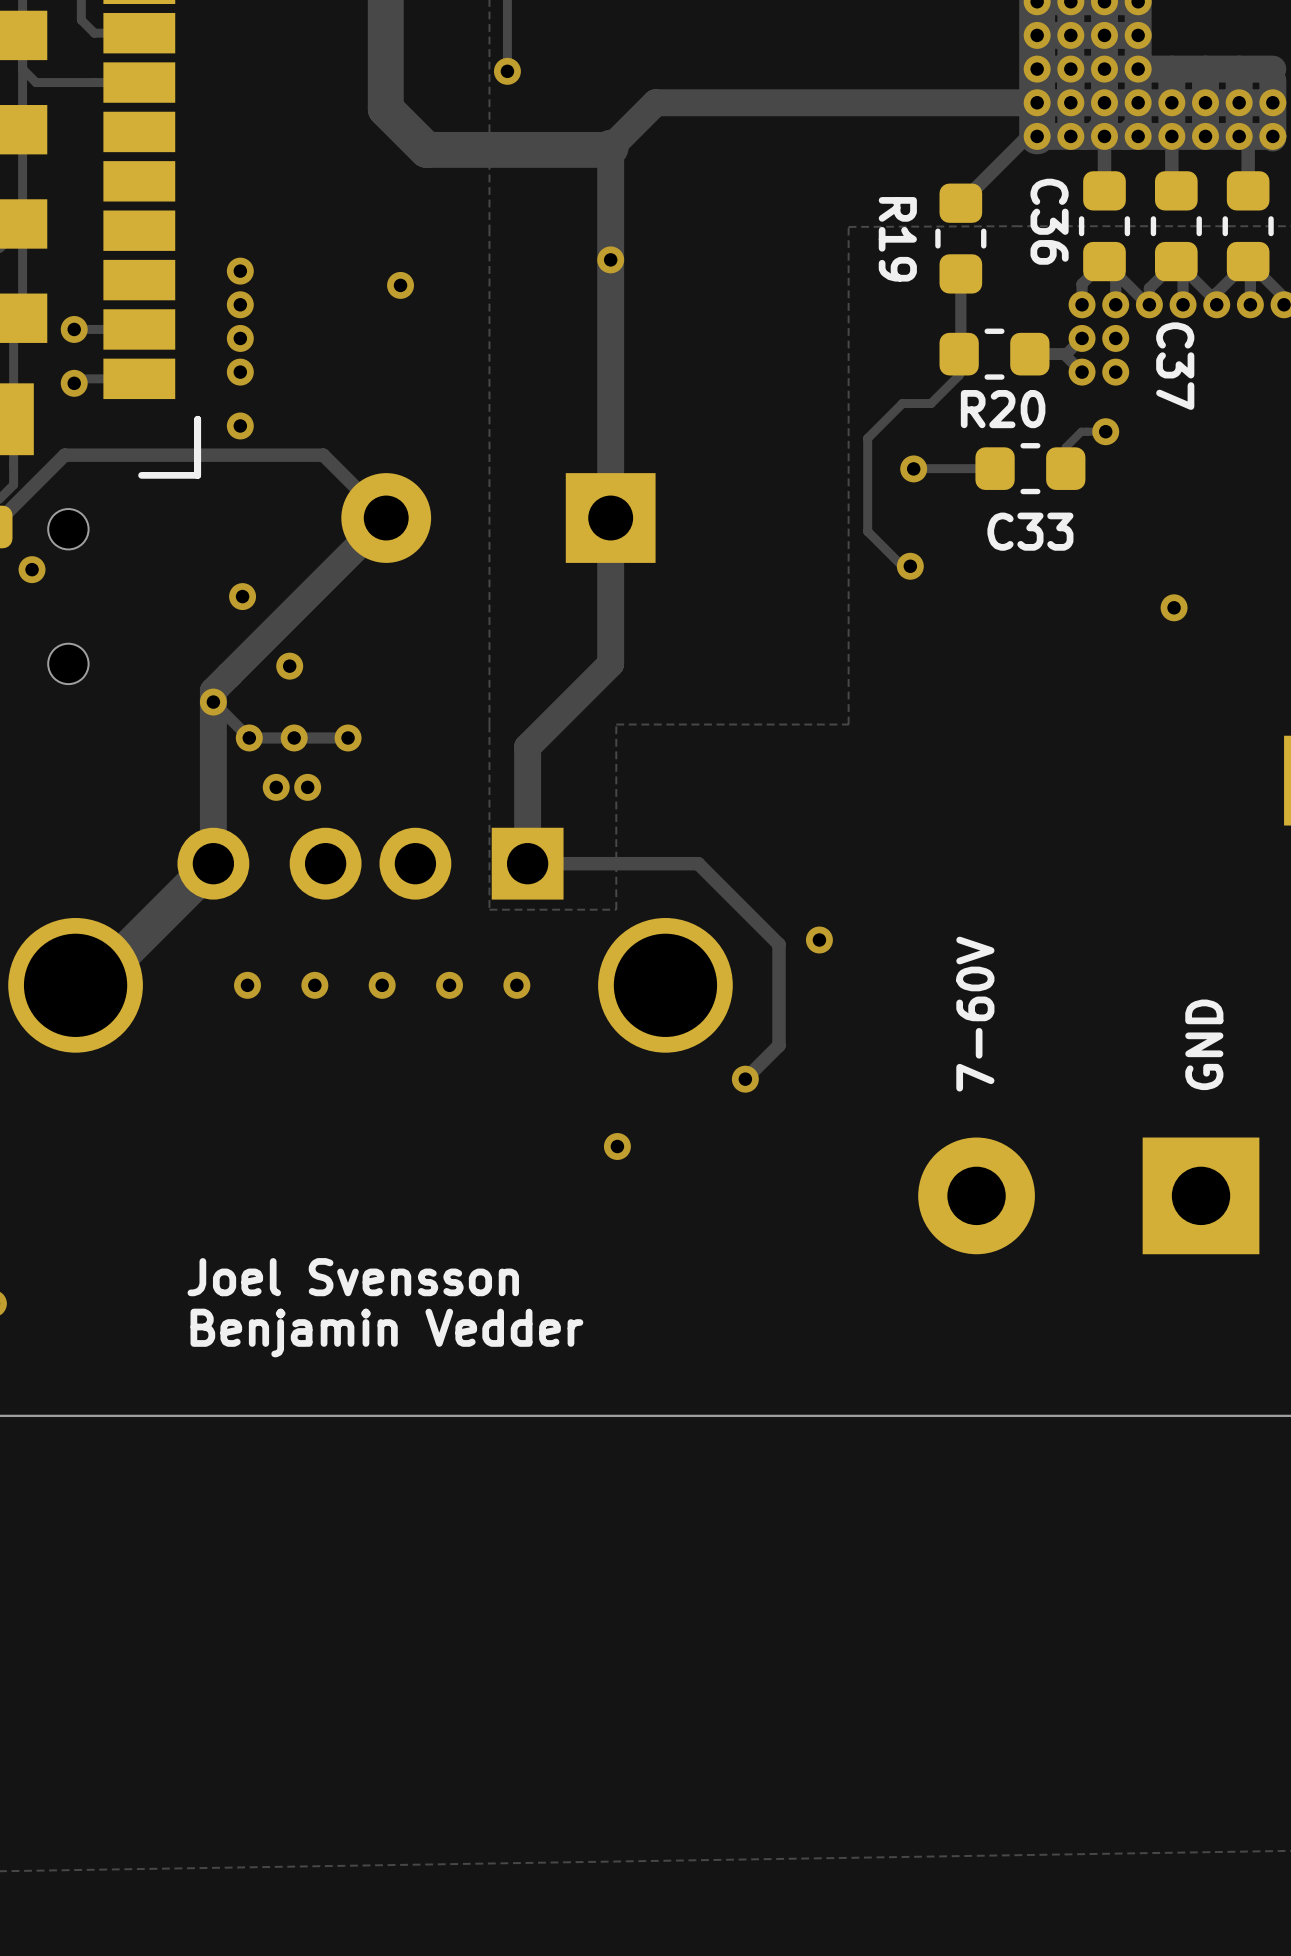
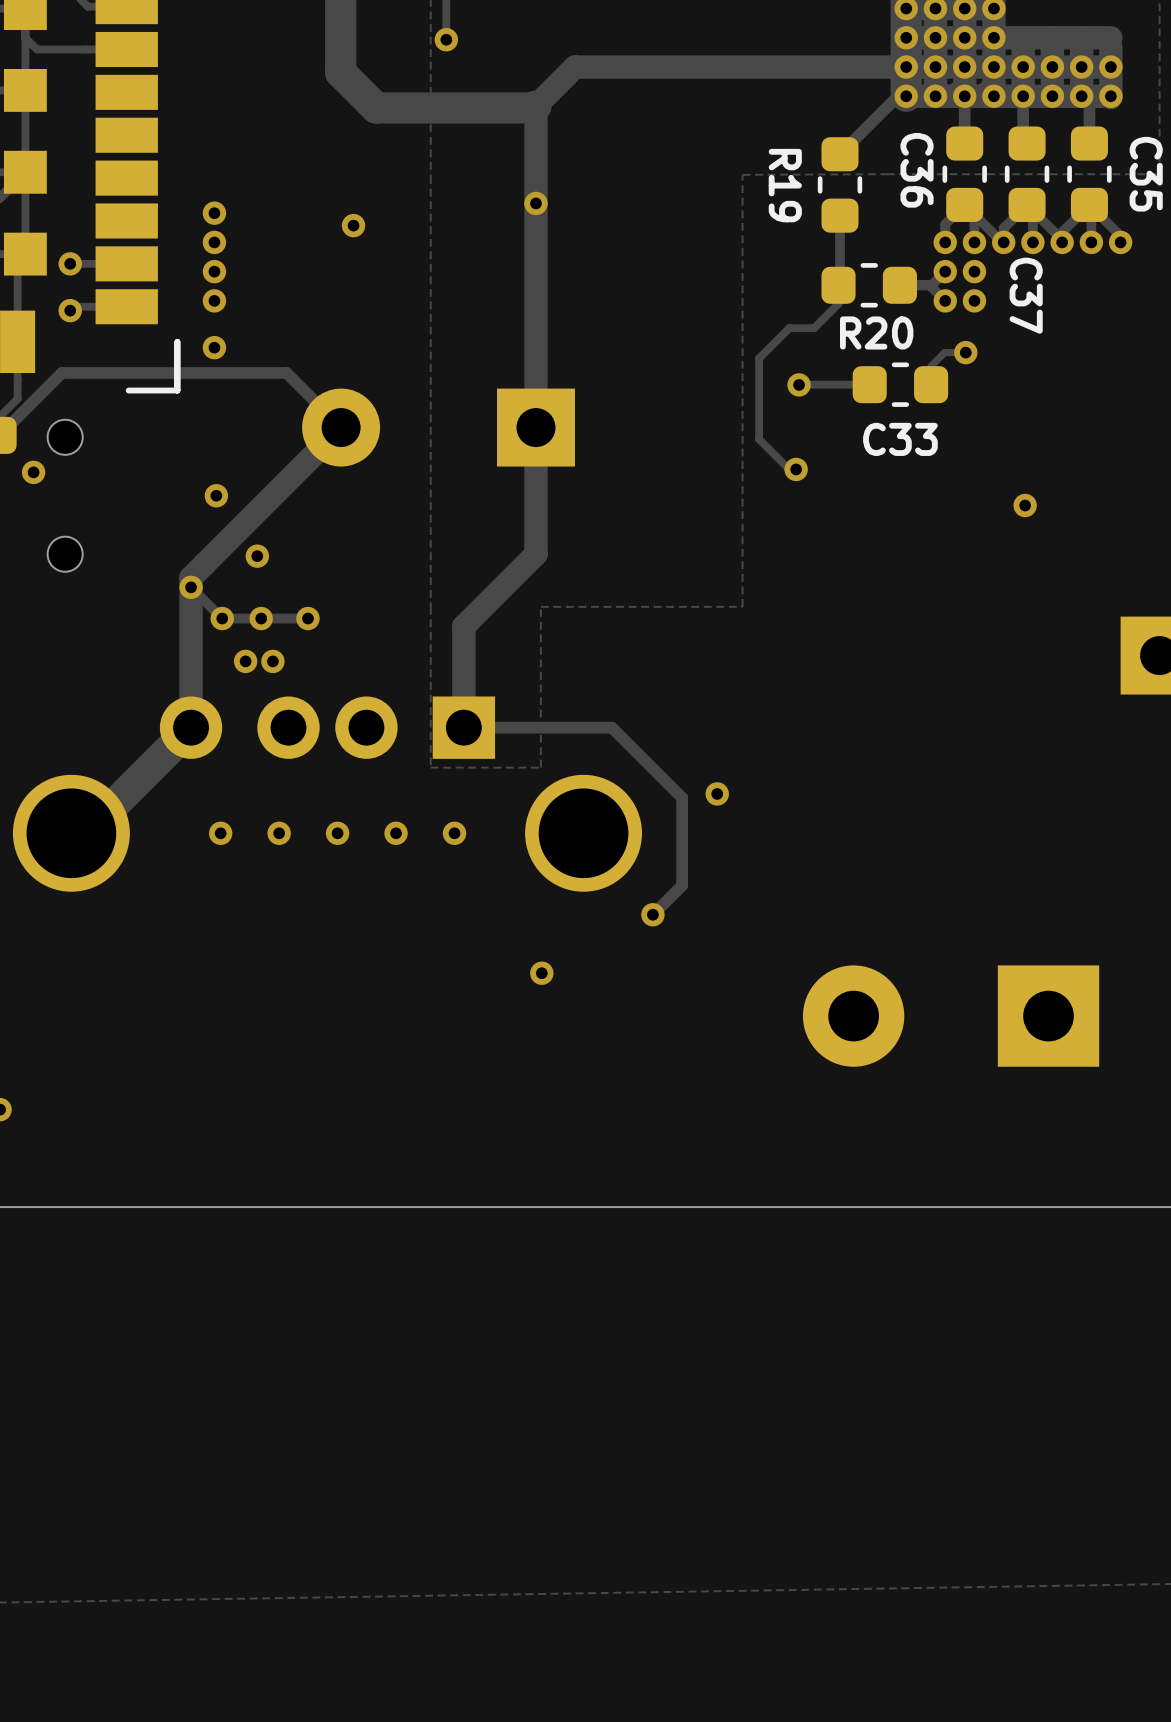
text: 7-60V (975, 1014) -> none
text: GND (1204, 1044) -> none
text: Joel Svensson (353, 1277) -> none
text: Benjamin Vedder (386, 1332) -> none

